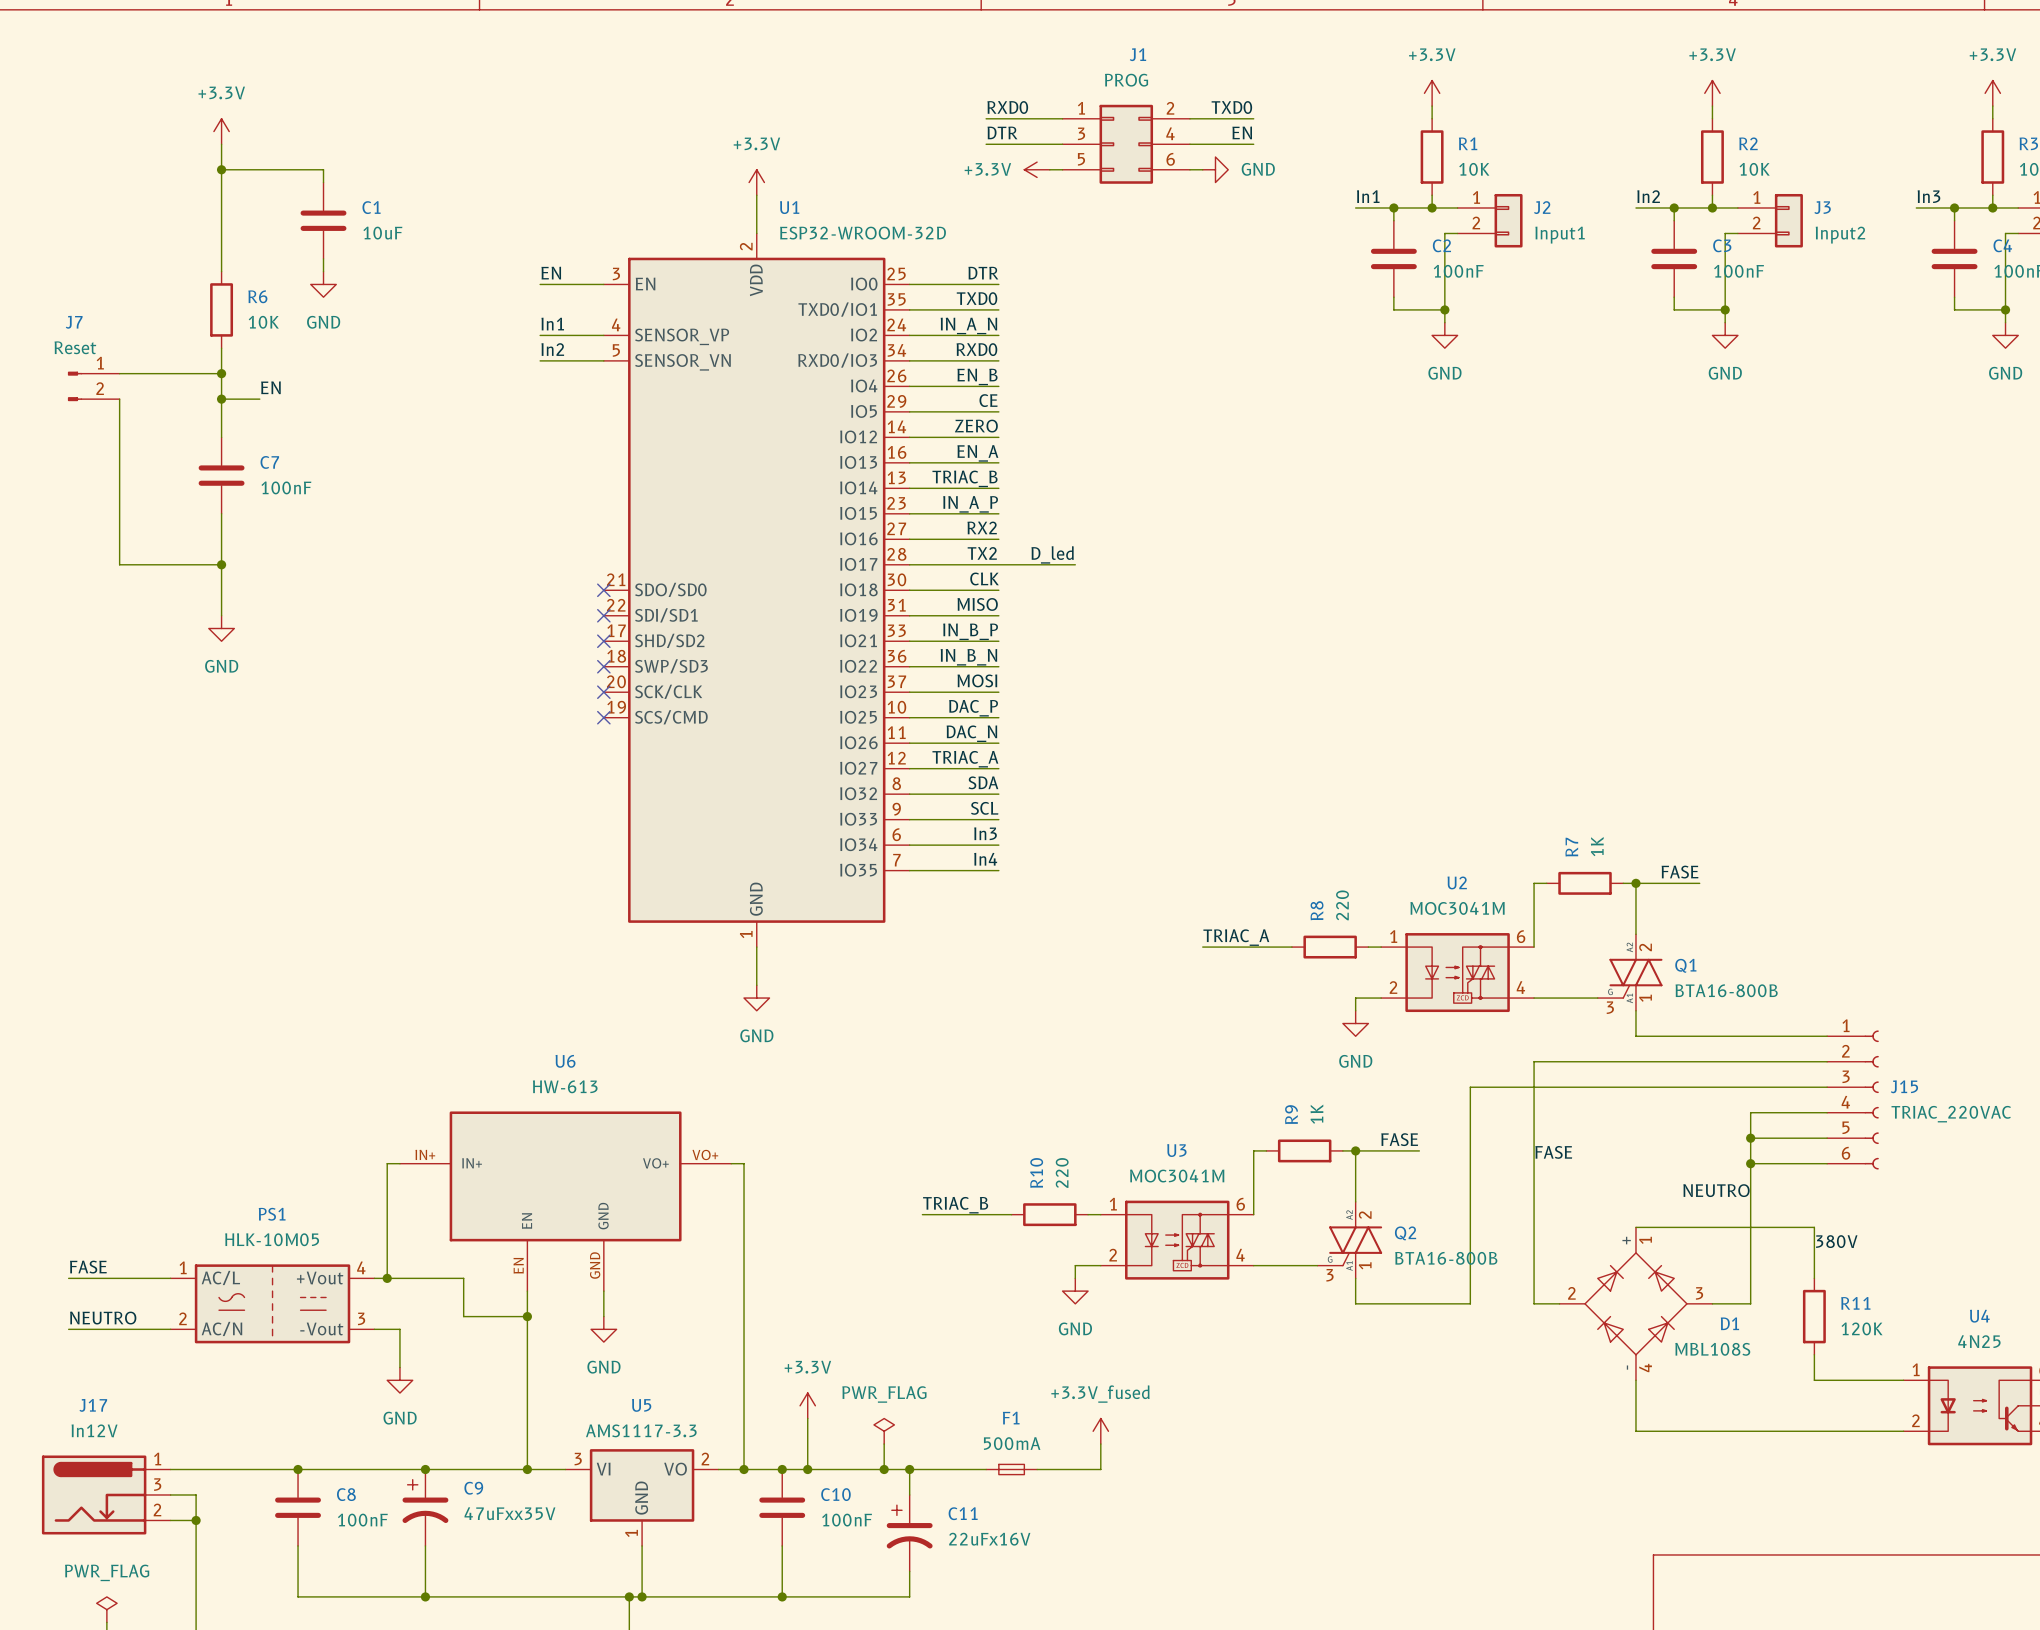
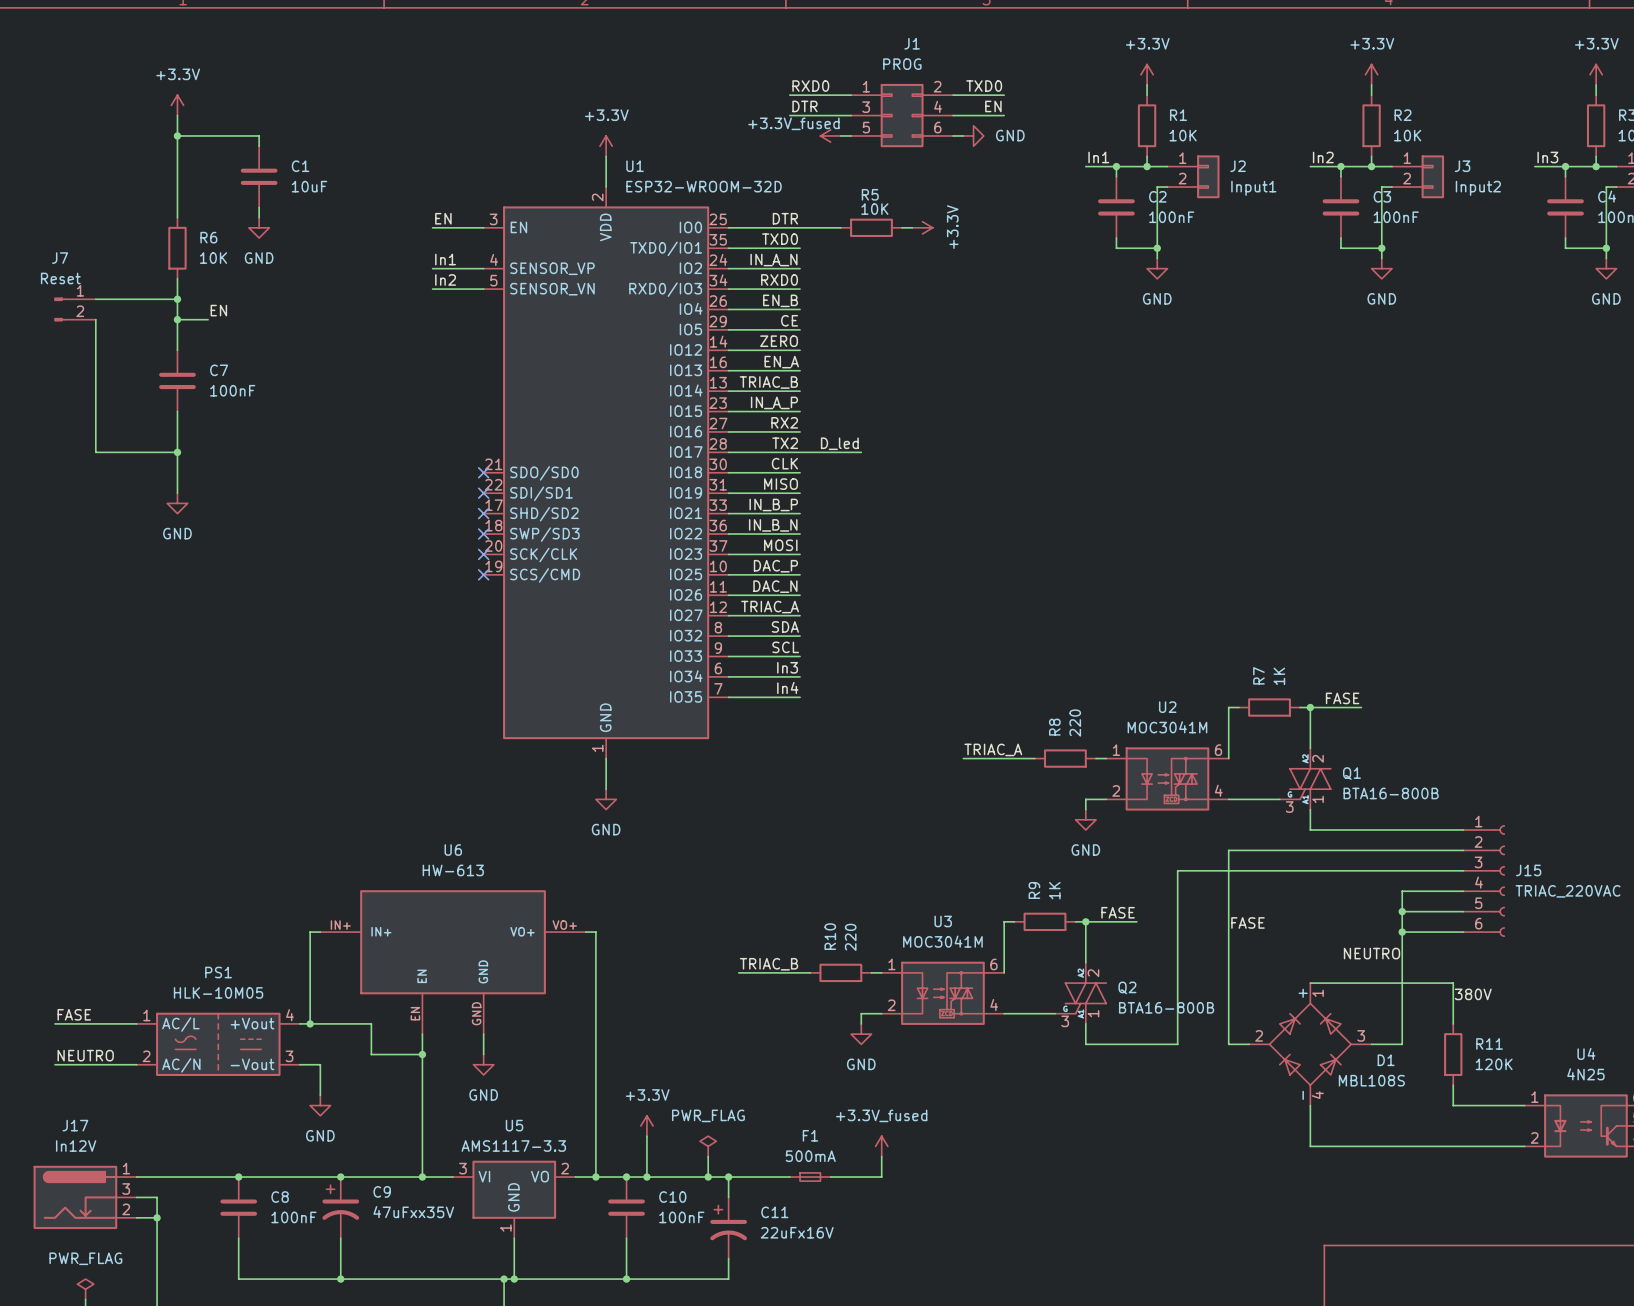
power symbol: +3.3V (1037, 169) -> +3.3V_fused (830, 135)
wire: none -> (800, 227) (840, 227)
R5: none -> 10K (871, 227)
wire: none -> (902, 227) (912, 227)
power symbol: none -> +3.3V (922, 227)

